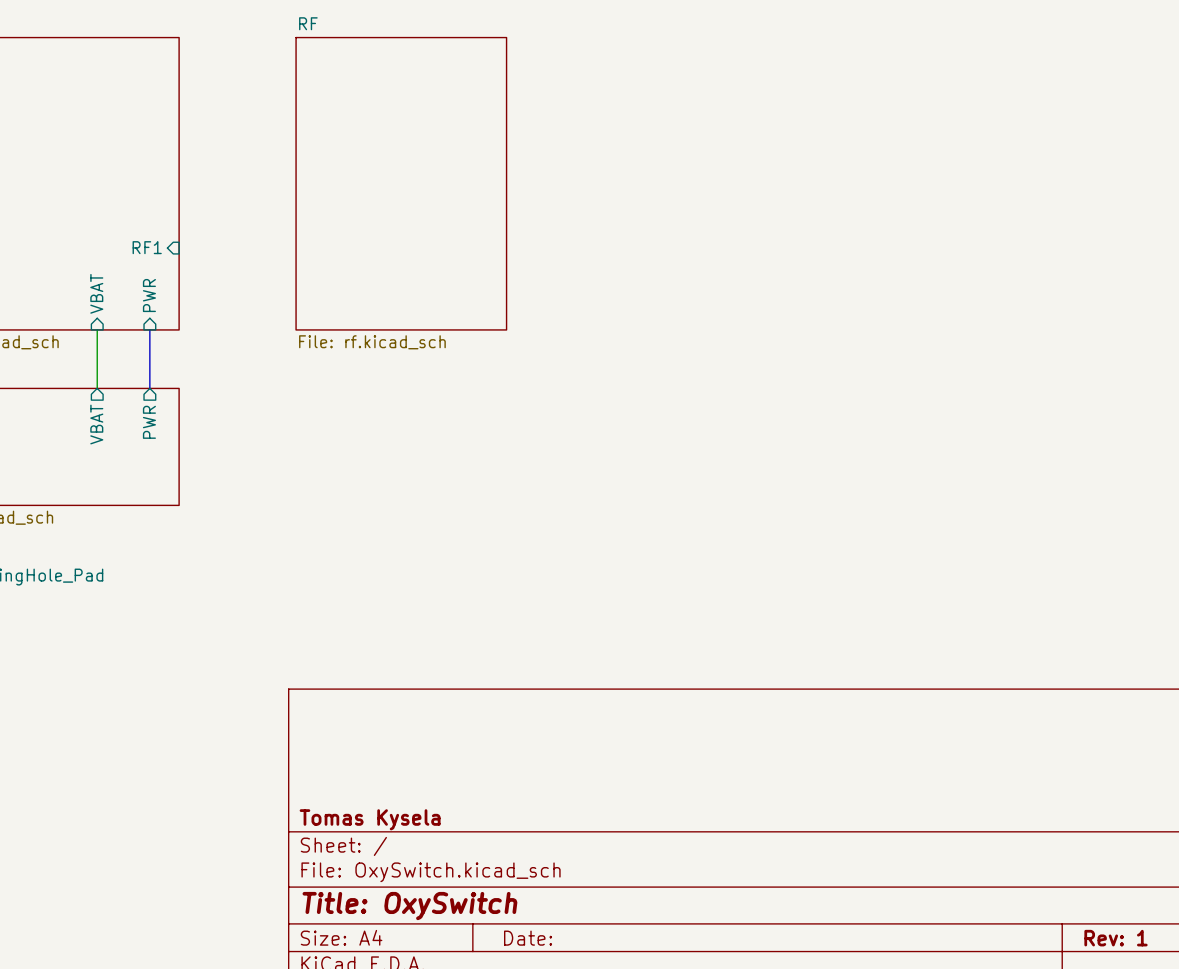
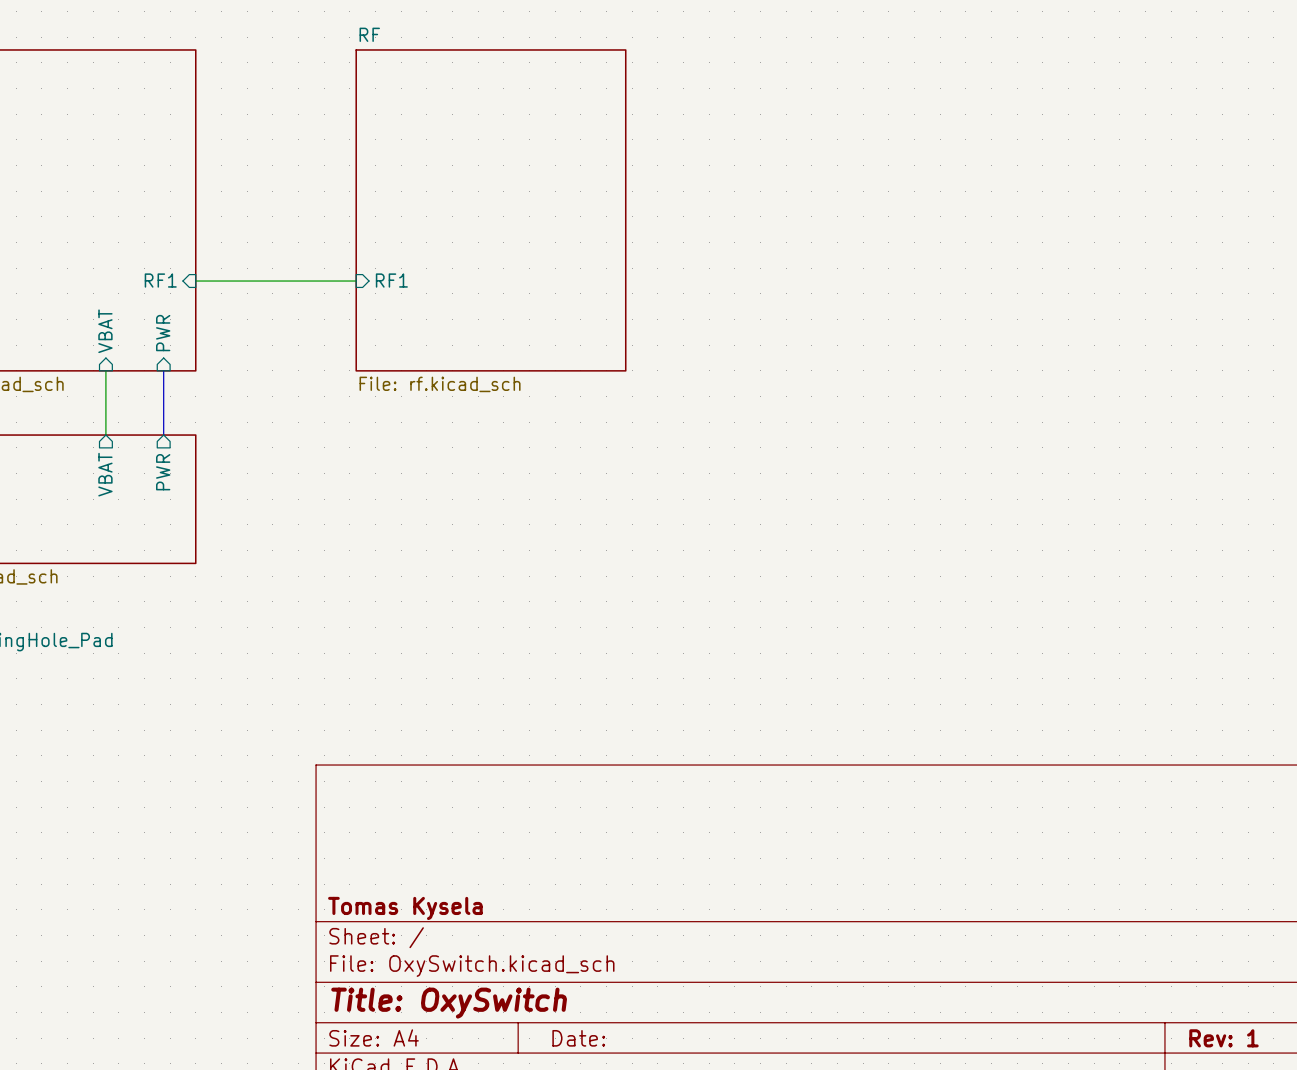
sheet RF: File: rf.kicad_sch (401, 183) -> none
sheet RF: none -> File: rf.kicad_sch (490, 210)
sheet pin: none -> RF1 (391, 280)
wire: none -> (195, 281) (356, 281)

